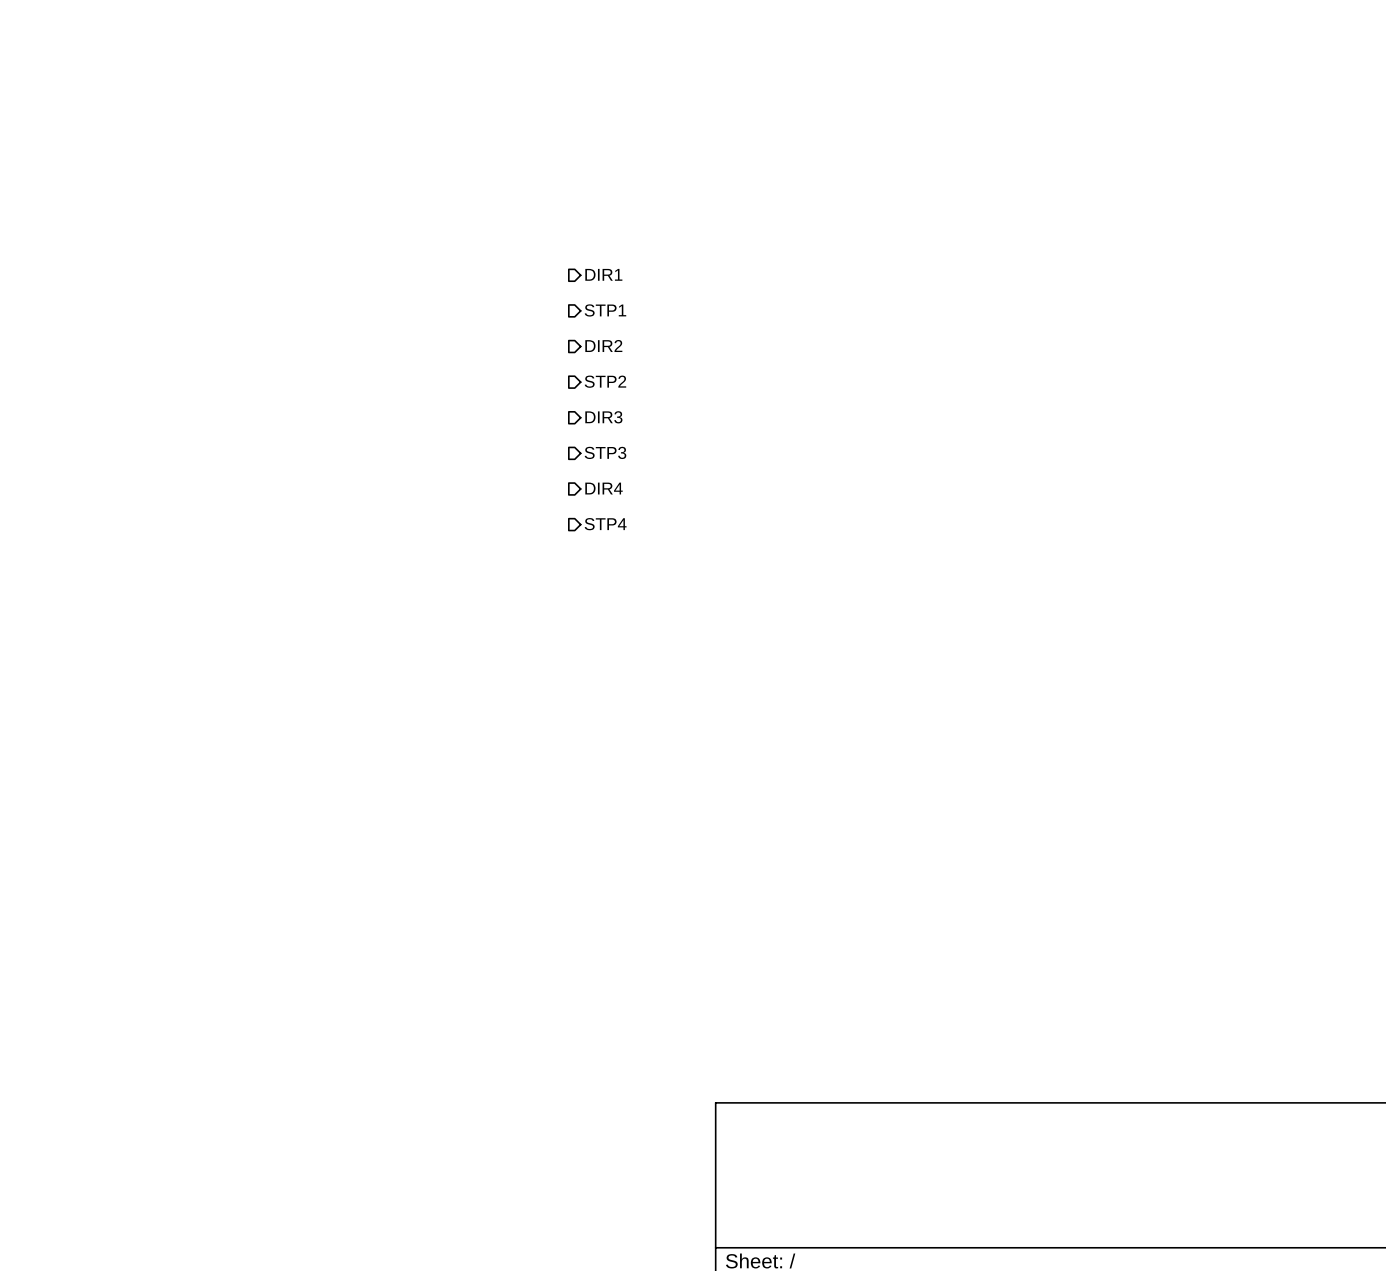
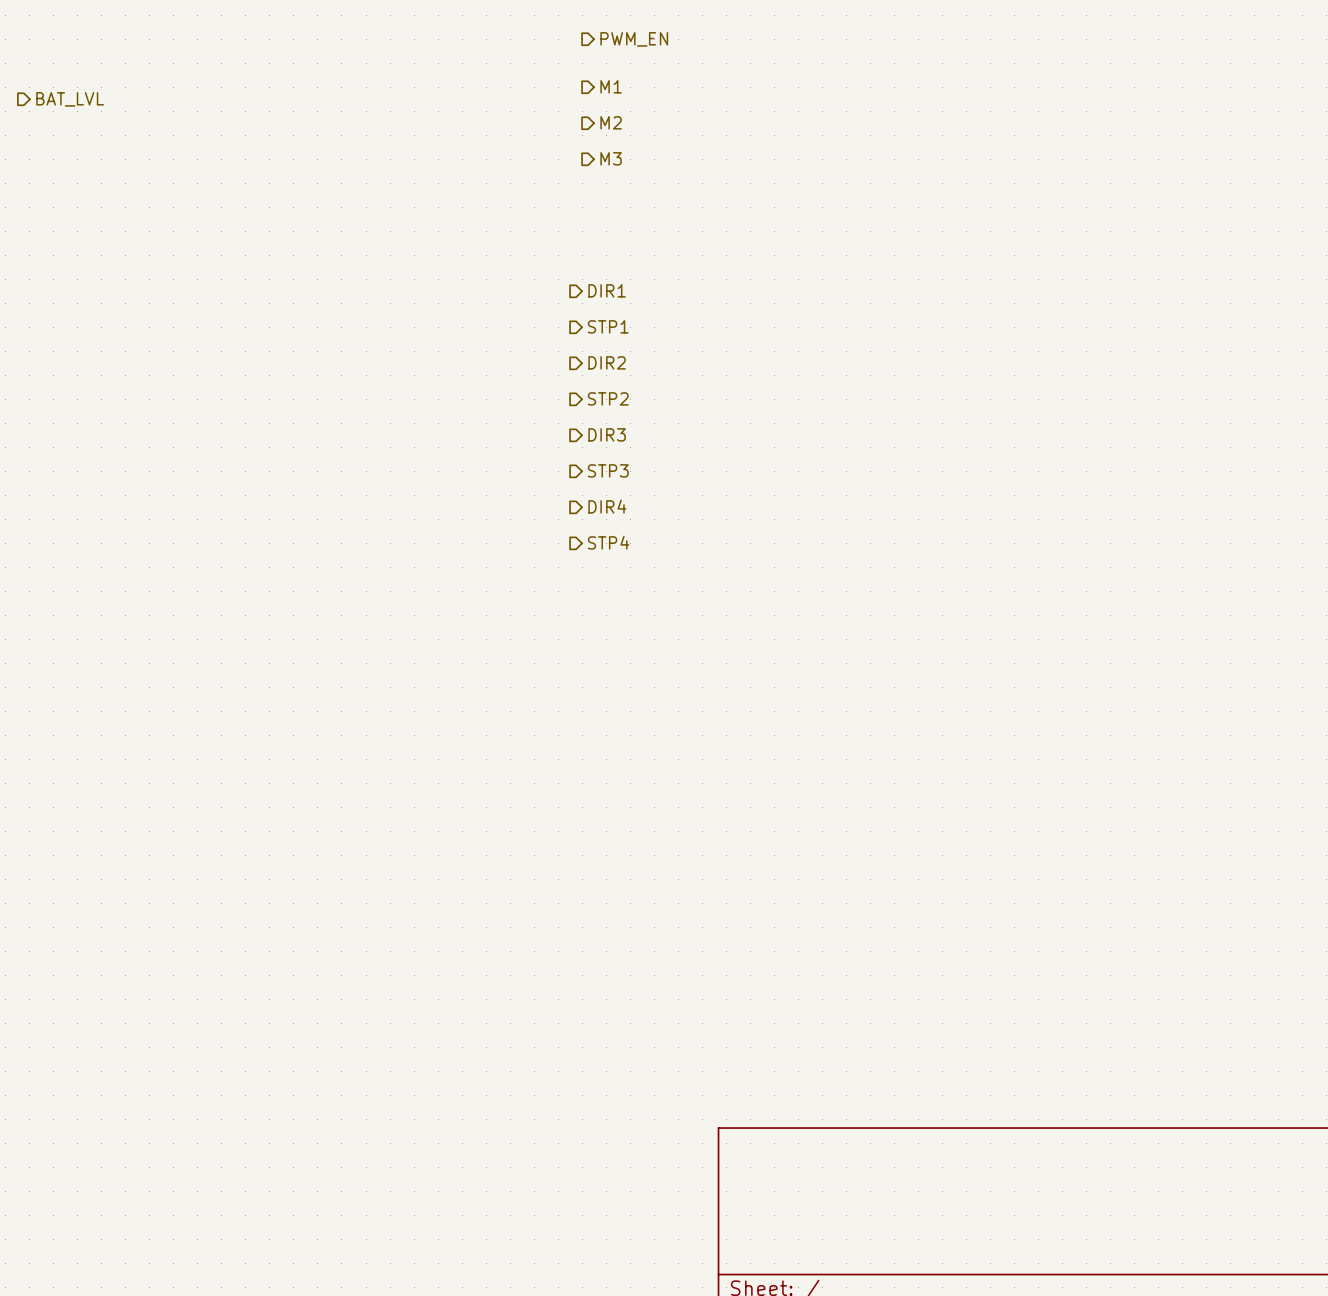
hierarchical label: none -> PWM_EN (634, 39)
hierarchical label: none -> M1 (611, 86)
hierarchical label: none -> BAT_LVL (70, 99)
hierarchical label: none -> M2 (611, 122)
hierarchical label: none -> M3 (611, 158)

